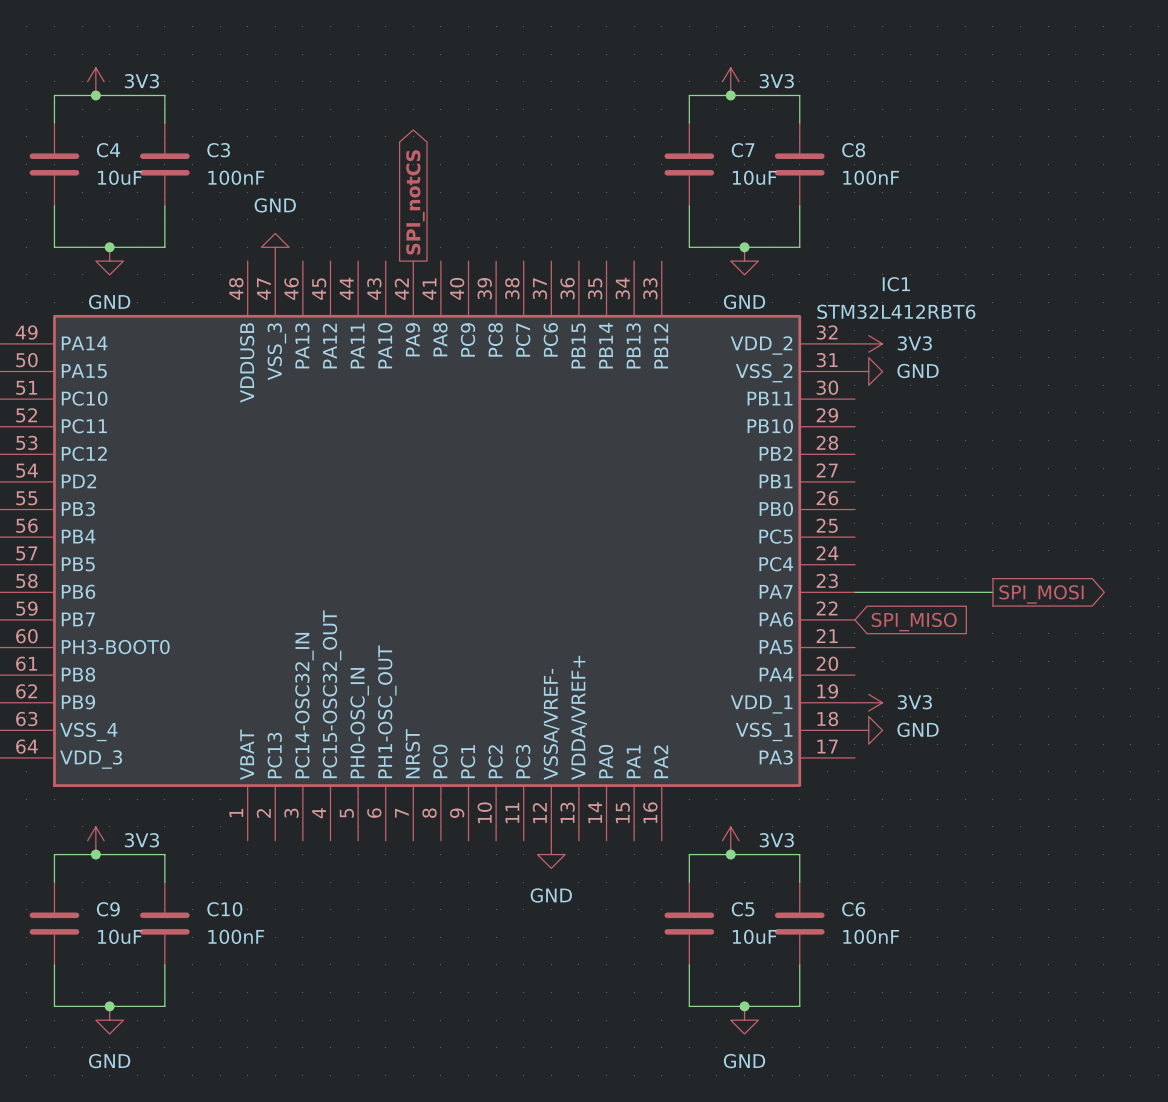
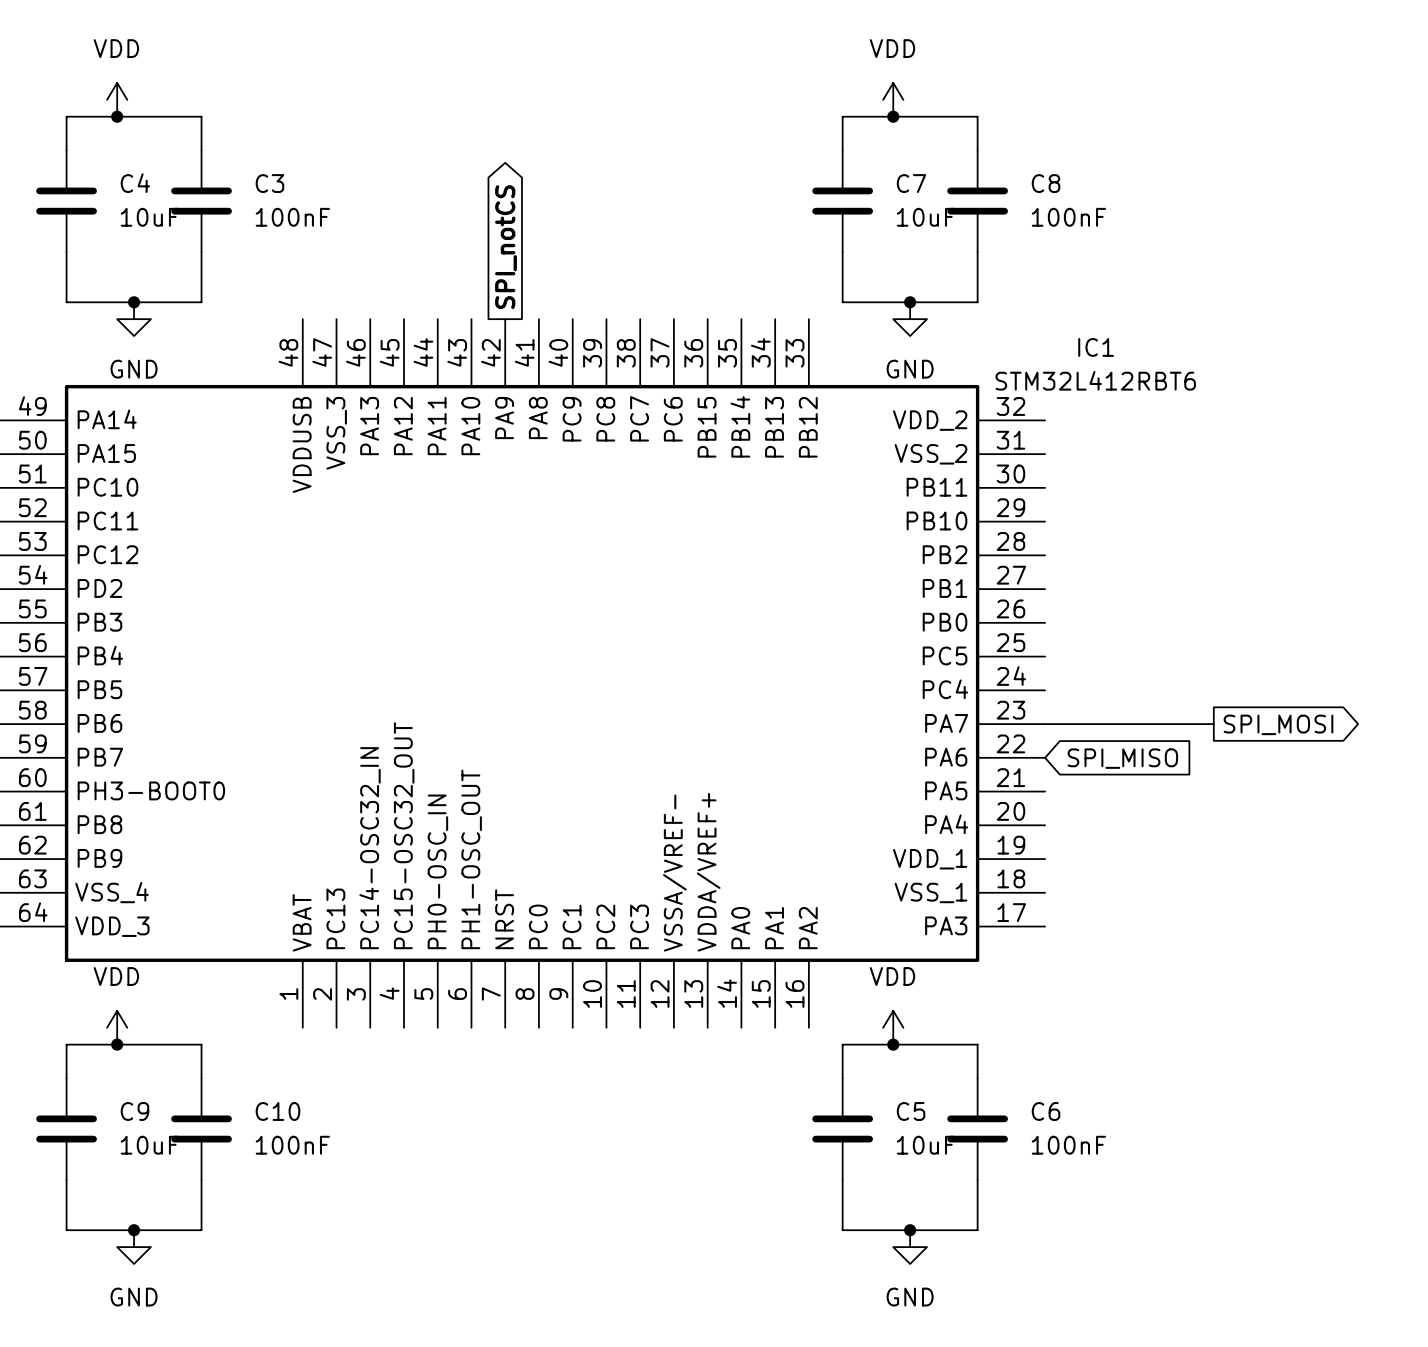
power symbol: 3V3 (95, 81) -> VDD (117, 99)
power symbol: 3V3 (730, 81) -> VDD (893, 99)
power symbol: GND (275, 247) -> none
power symbol: 3V3 (868, 343) -> none
power symbol: GND (868, 371) -> none
power symbol: 3V3 (868, 702) -> none
power symbol: GND (868, 730) -> none
power symbol: 3V3 (95, 840) -> VDD (117, 1027)
power symbol: 3V3 (730, 840) -> VDD (893, 1027)
power symbol: GND (551, 854) -> none

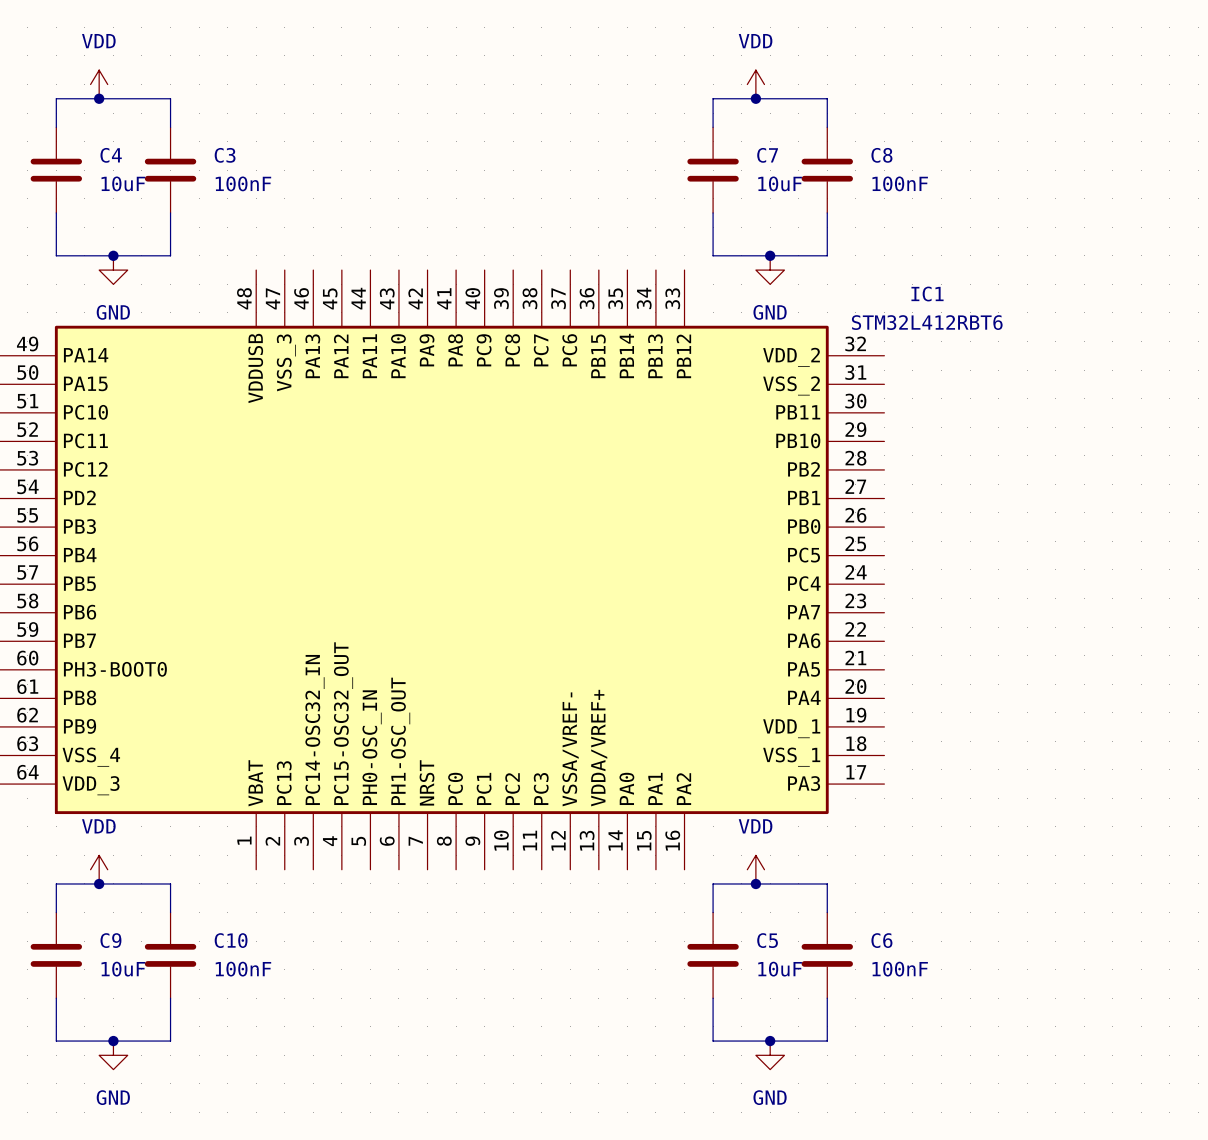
global label: SPI_notCS (506, 247) -> none
wire: (1045, 724) (1213, 724) -> none
global label: SPI_MOSI (1278, 724) -> none
global label: SPI_MISO (1122, 758) -> none

